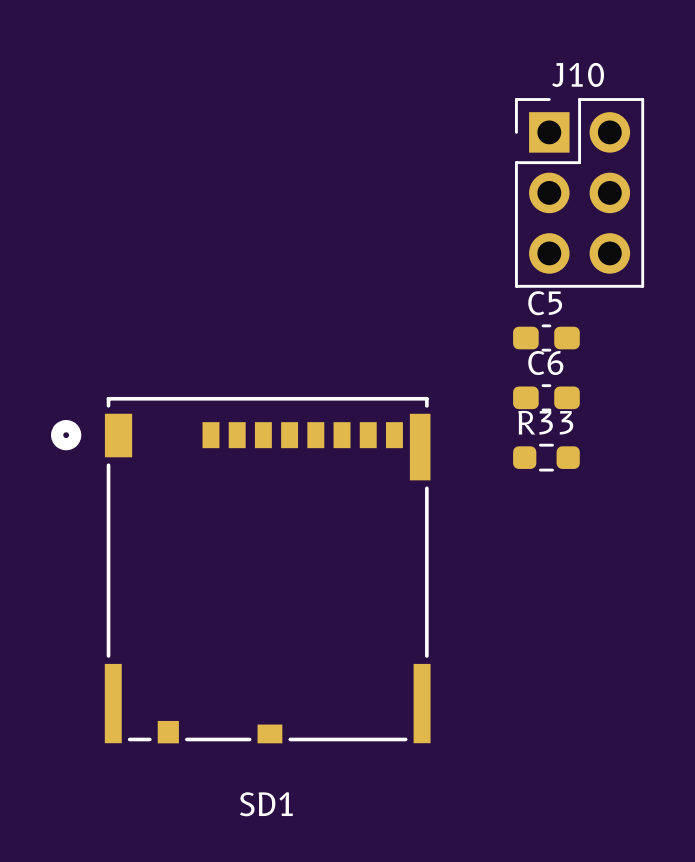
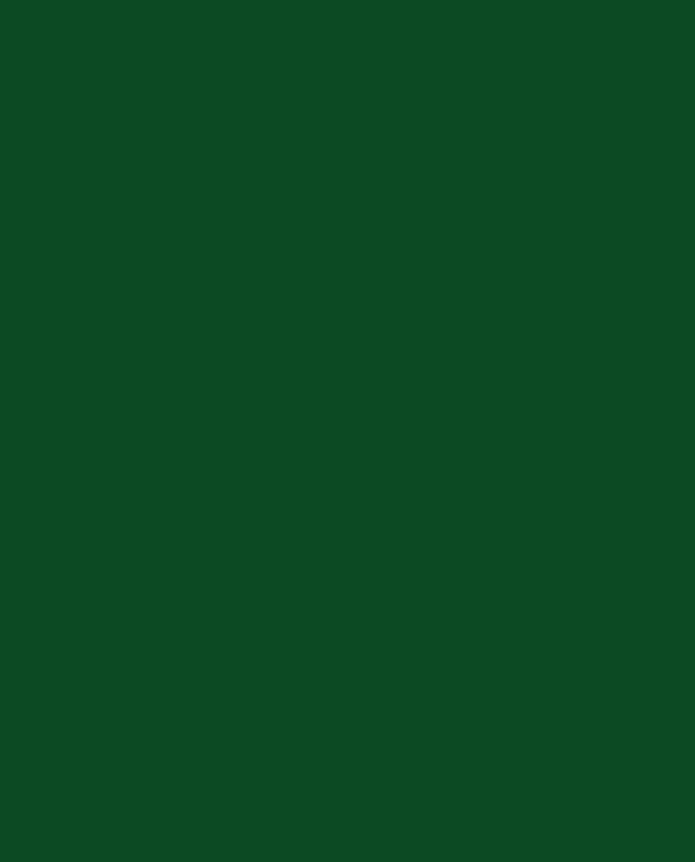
J10: (579, 192) -> none
C5: (546, 338) -> none
C6: (546, 397) -> none
R33: (546, 457) -> none
SD1: (240, 570) -> none

